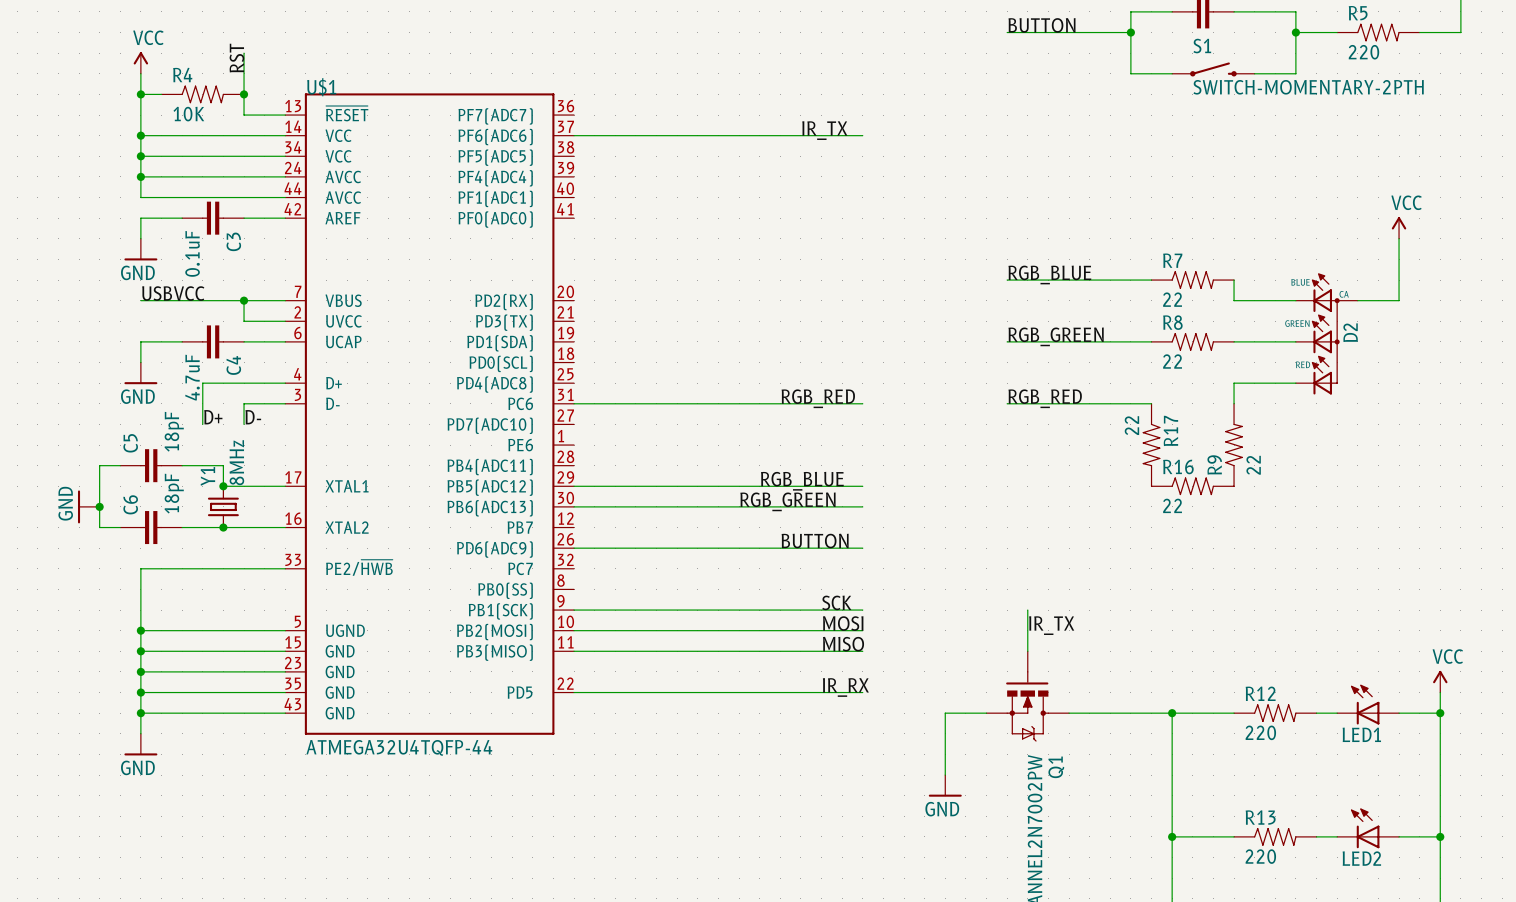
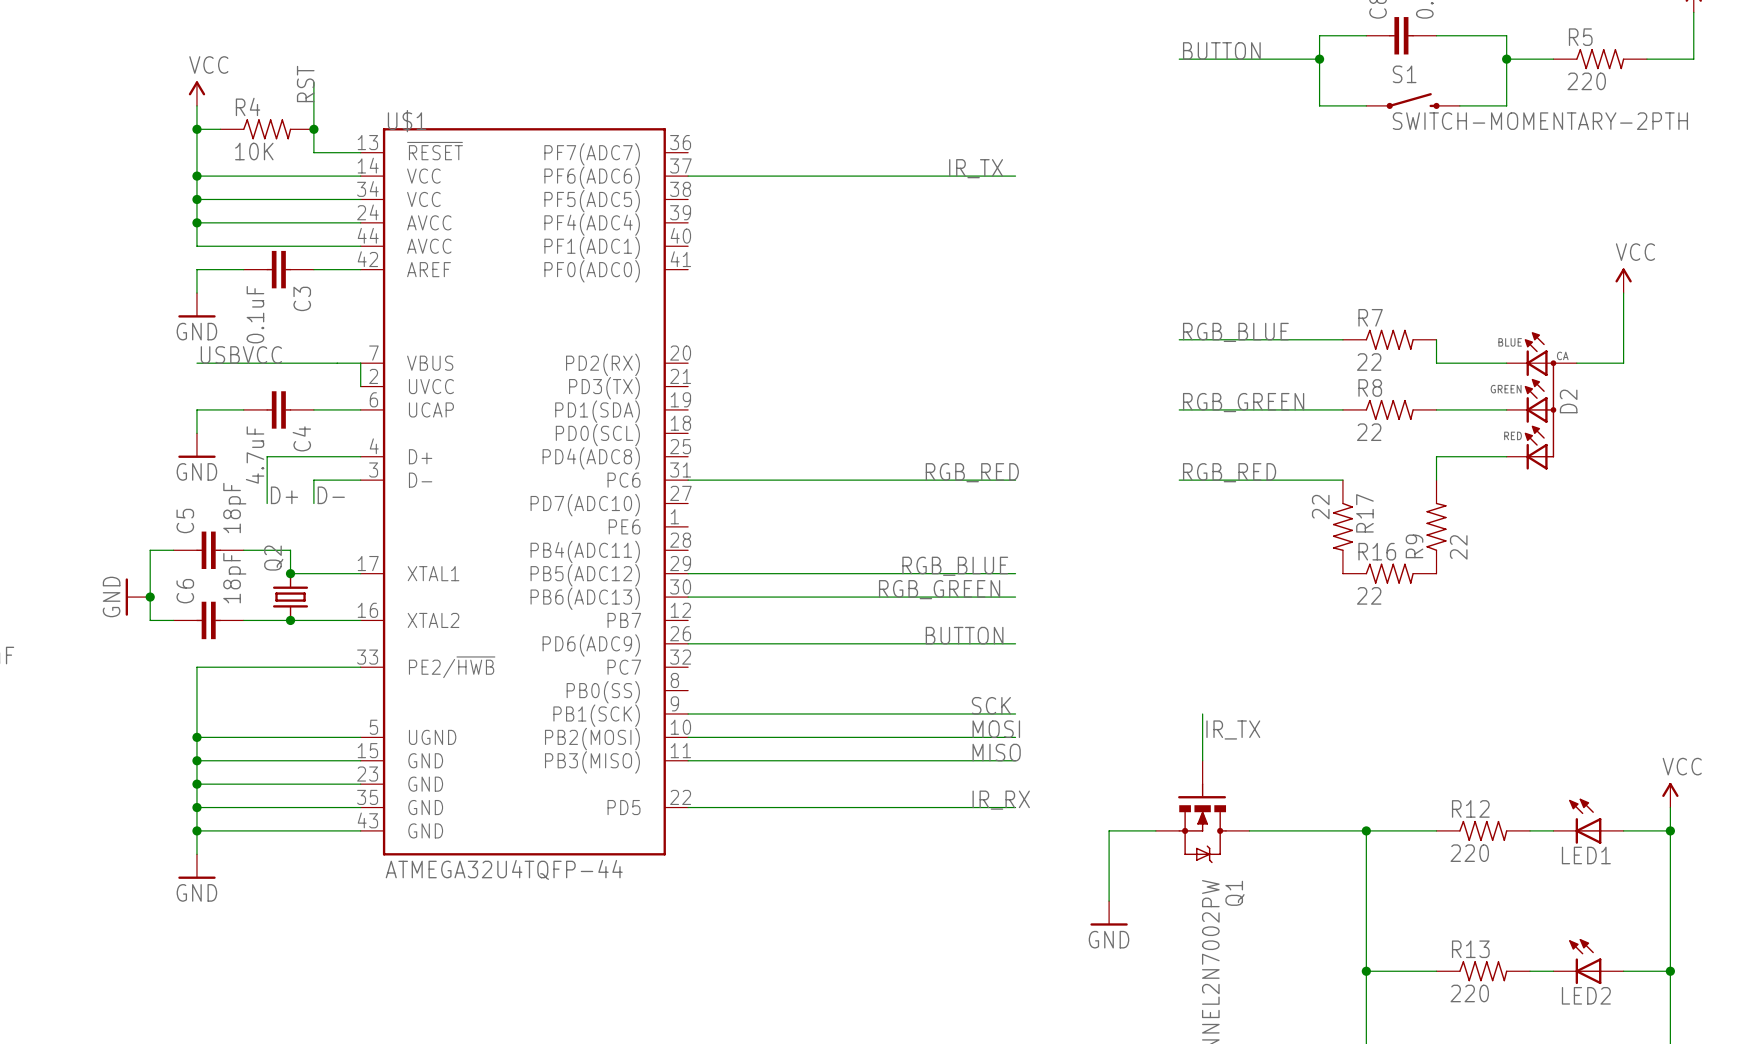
wire: (244, 300) (244, 321) (285, 321) -> (360, 363) (360, 386)
junction: (244, 300) -> none
Y1 value: 8MHz (236, 462) -> none
Y1 name: Y1 (207, 476) -> Q2 (273, 558)

